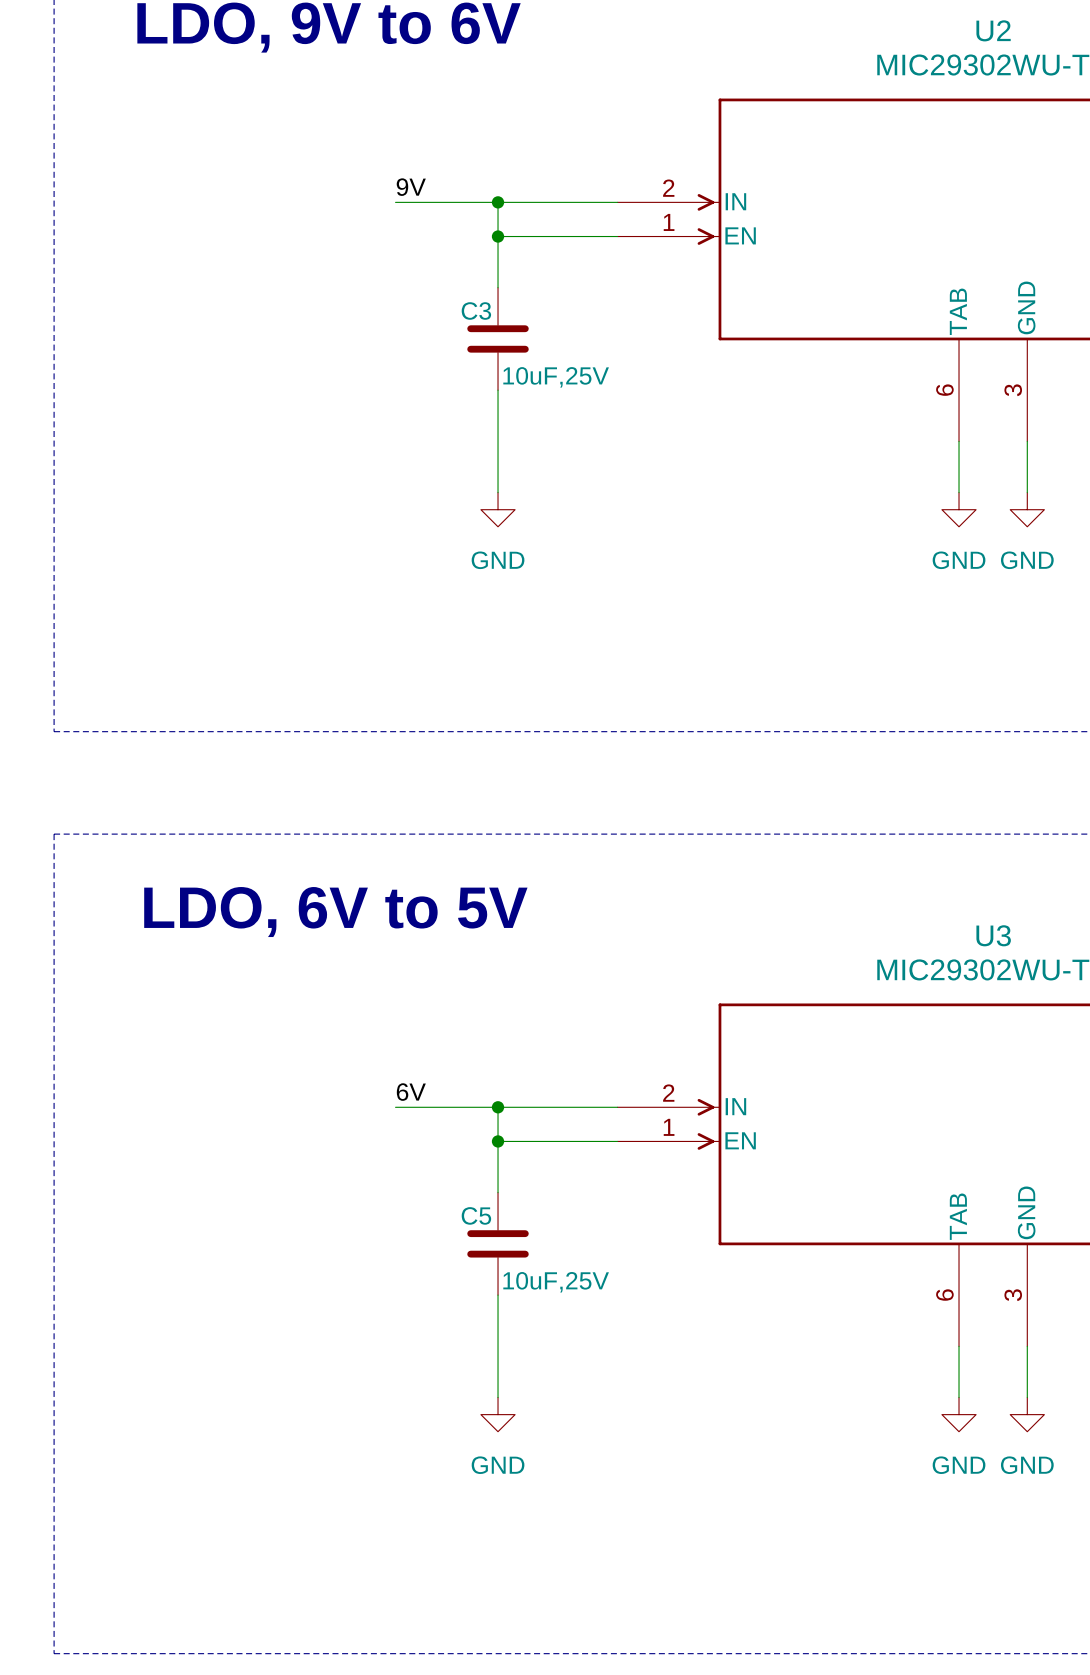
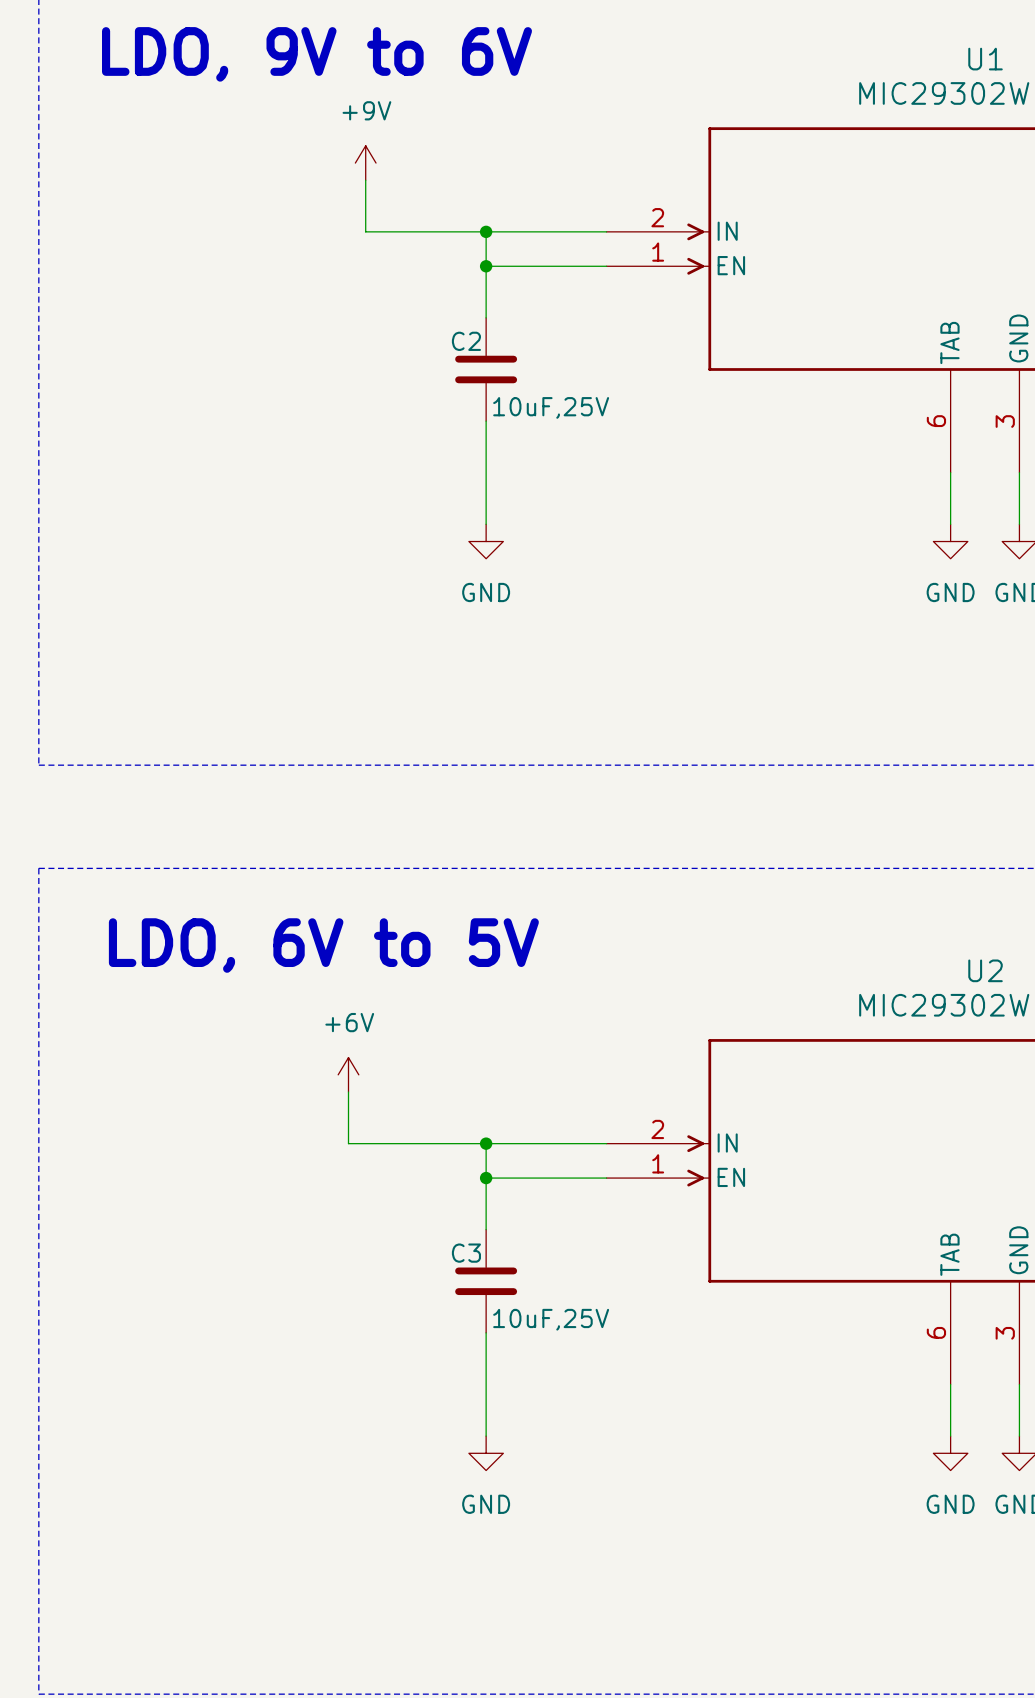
U2 name: U2 (993, 30) -> U1 (985, 59)
power symbol: none -> +9V (365, 163)
wire: none -> (365, 180) (365, 231) (382, 231)
label: 9V (411, 187) -> none
C3 name: C3 (476, 311) -> C2 (466, 341)
U3 name: U3 (993, 935) -> U2 (985, 970)
power symbol: none -> +6V (348, 1074)
wire: none -> (348, 1092) (348, 1143) (382, 1143)
label: 6V (411, 1092) -> none
C5 name: C5 (476, 1215) -> C3 (466, 1253)

